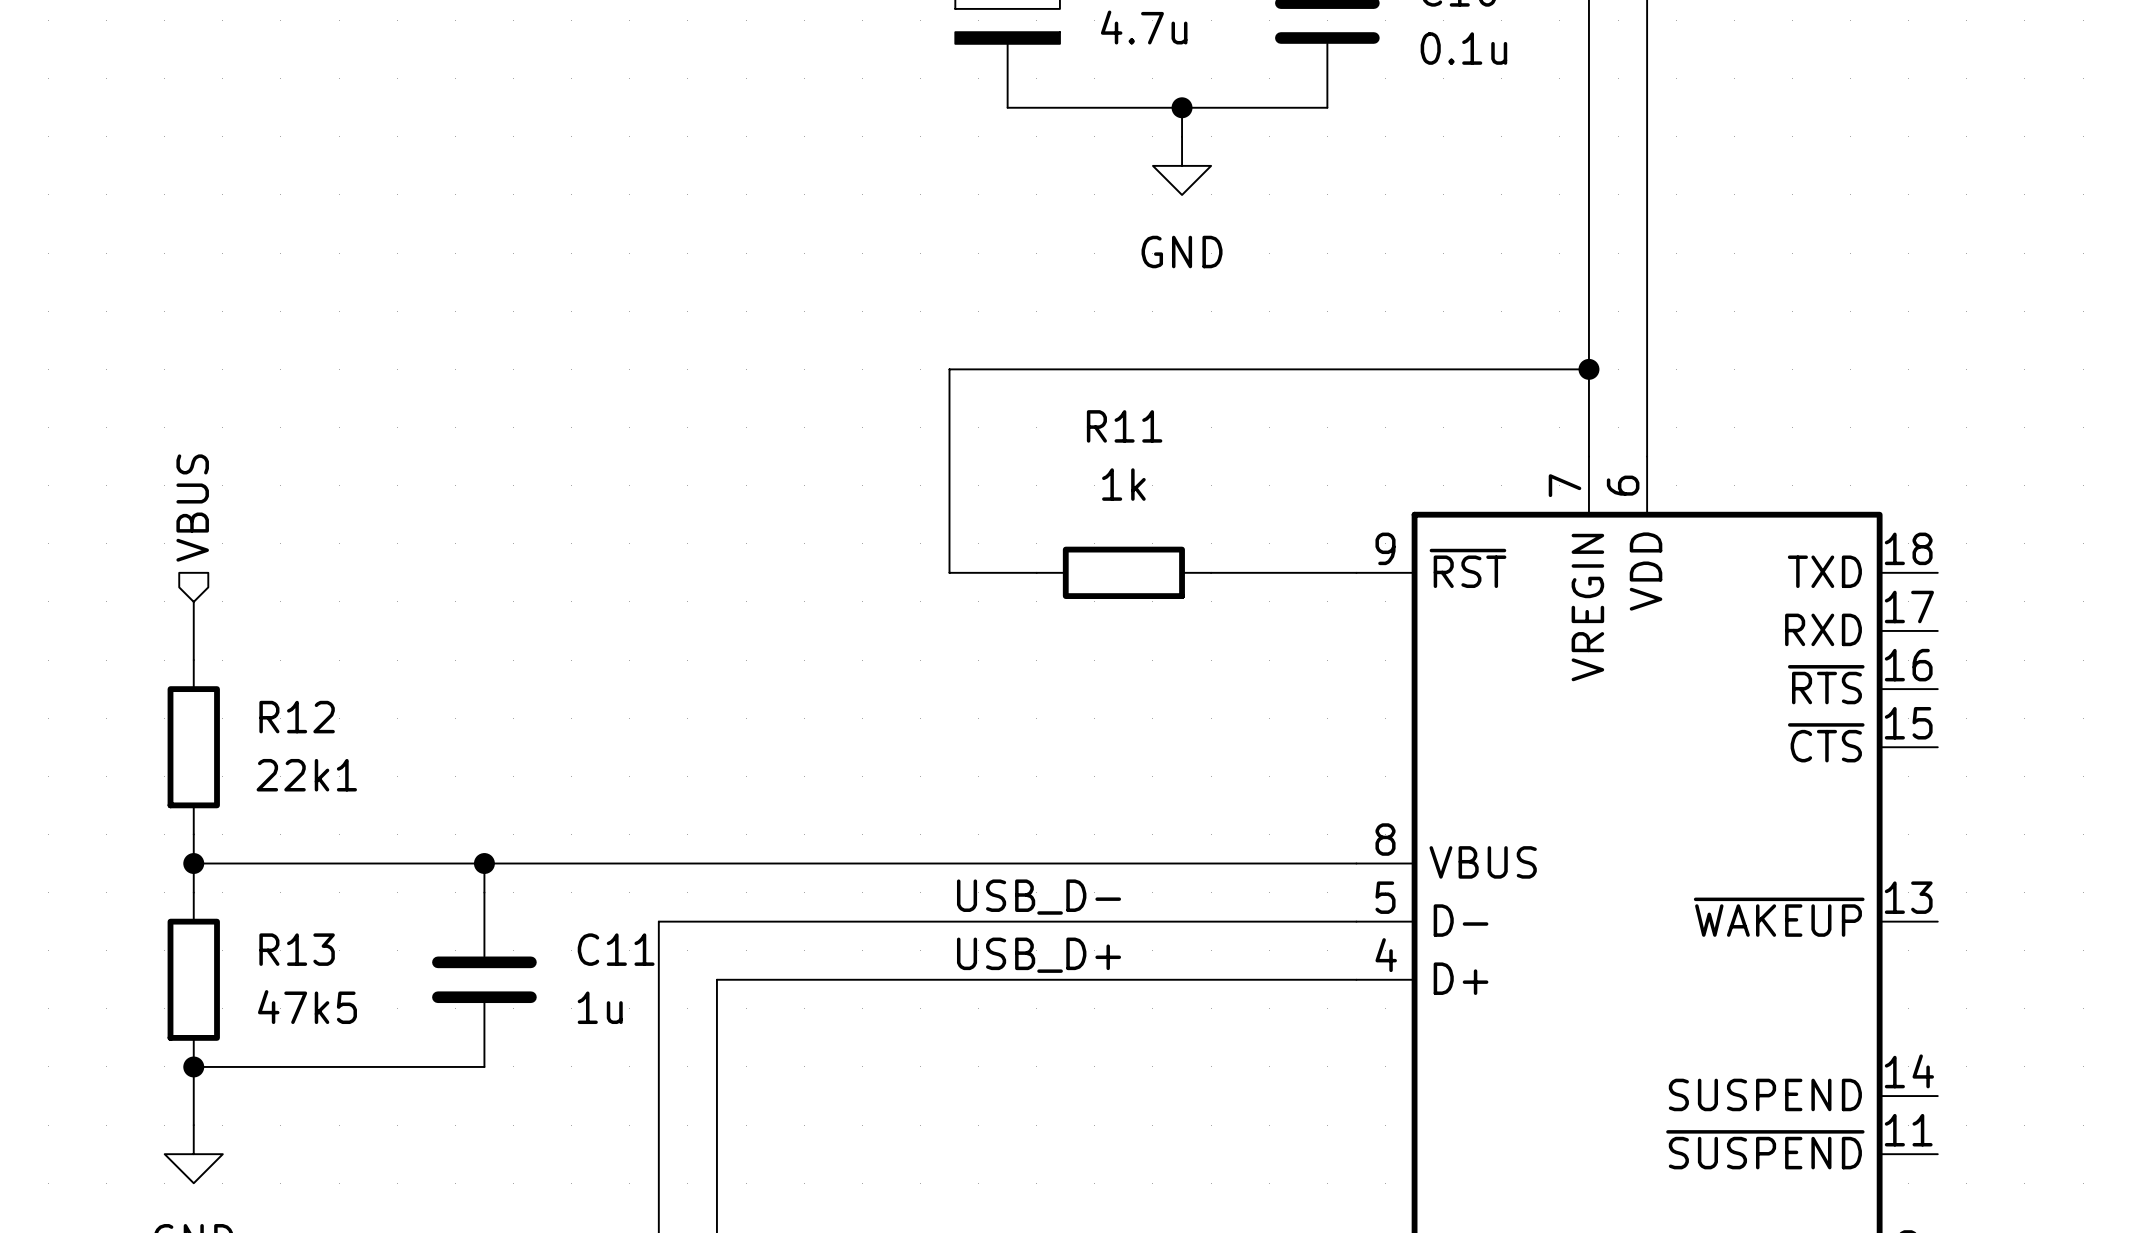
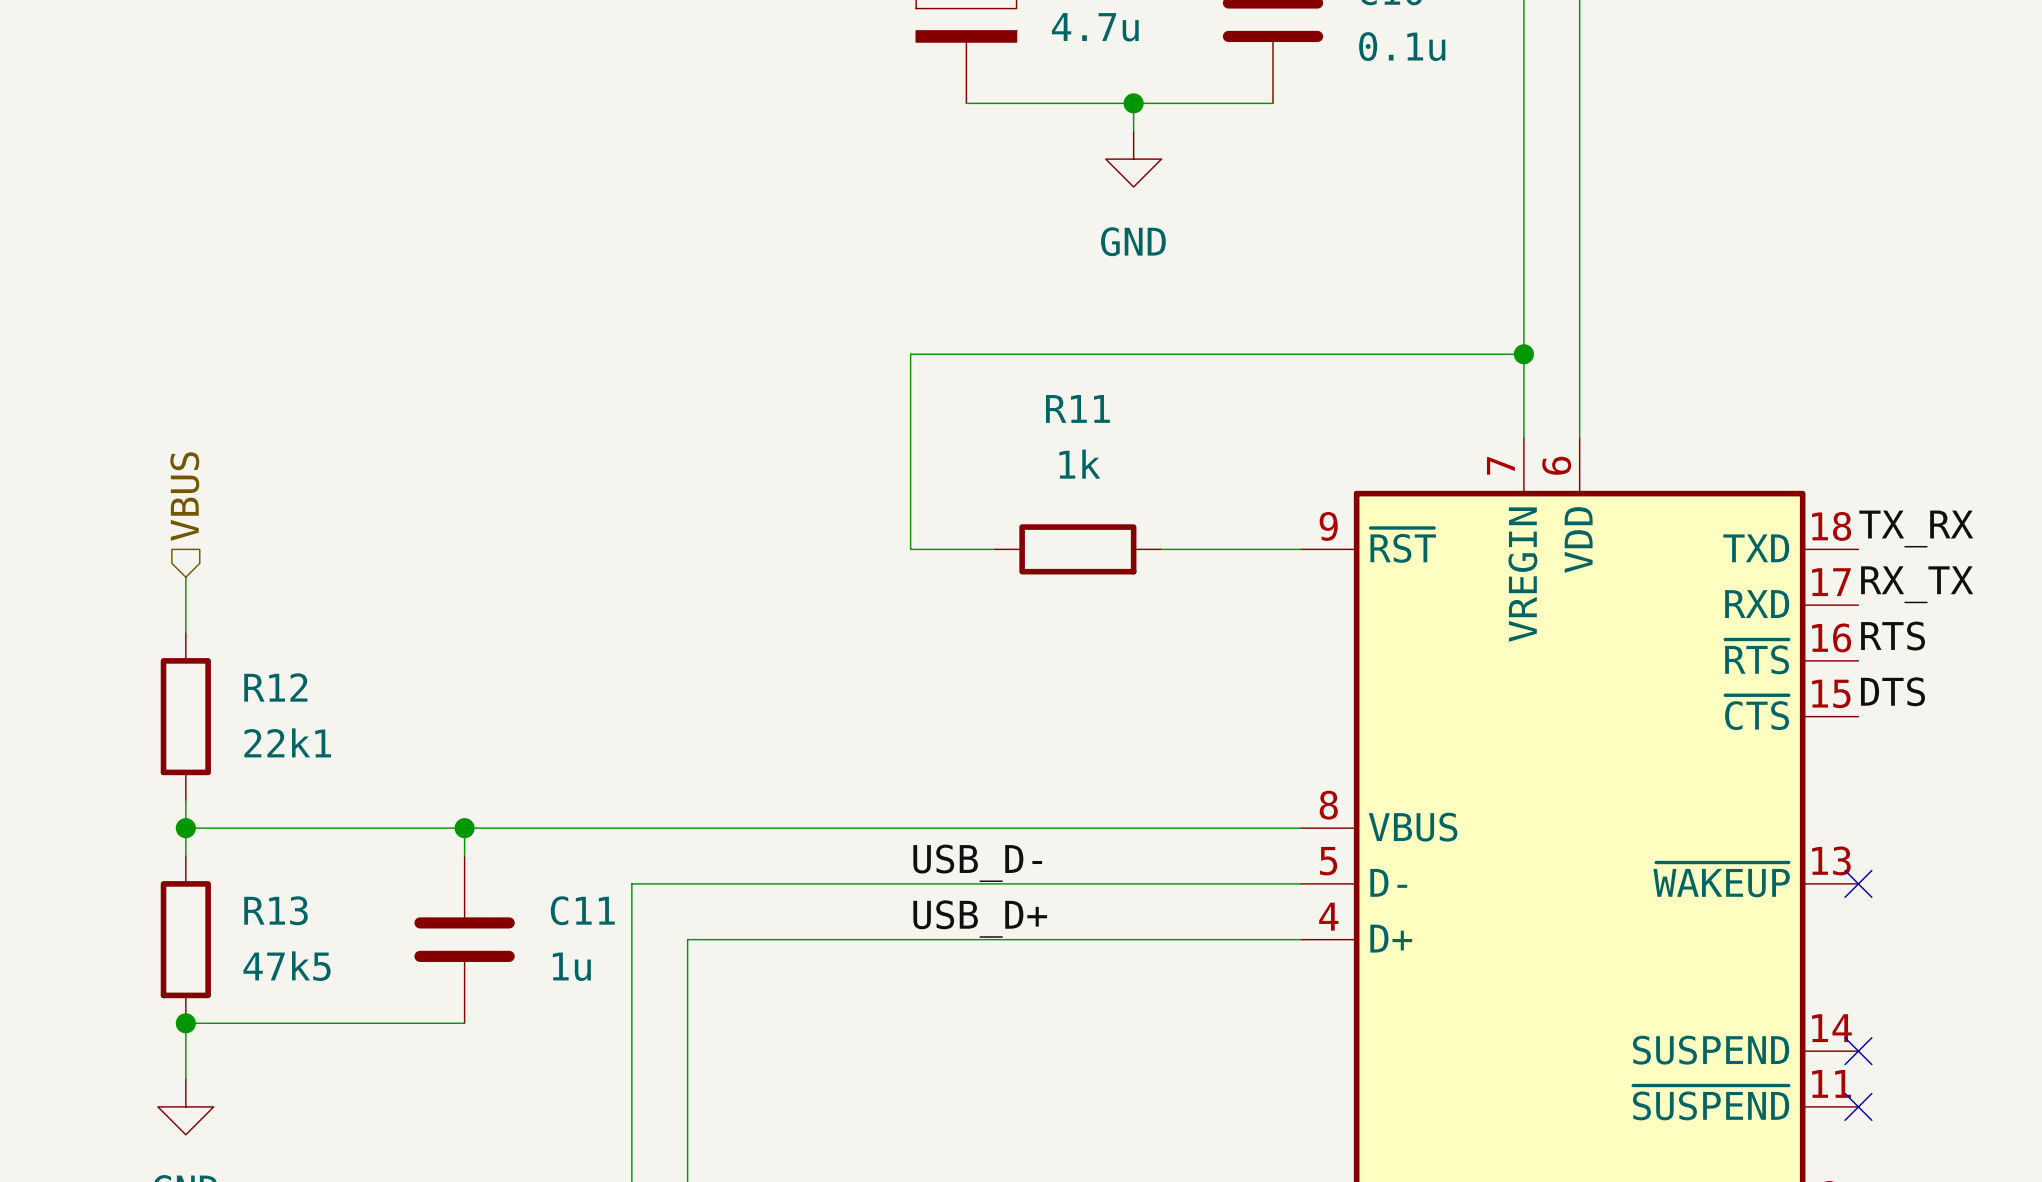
label: none -> TX_RX (1916, 529)
label: none -> RX_TX (1917, 584)
label: none -> RTS (1893, 636)
label: none -> DTS (1892, 691)
no-connect mark: none -> (1858, 883)
no-connect mark: none -> (1858, 1051)
no-connect mark: none -> (1858, 1106)

